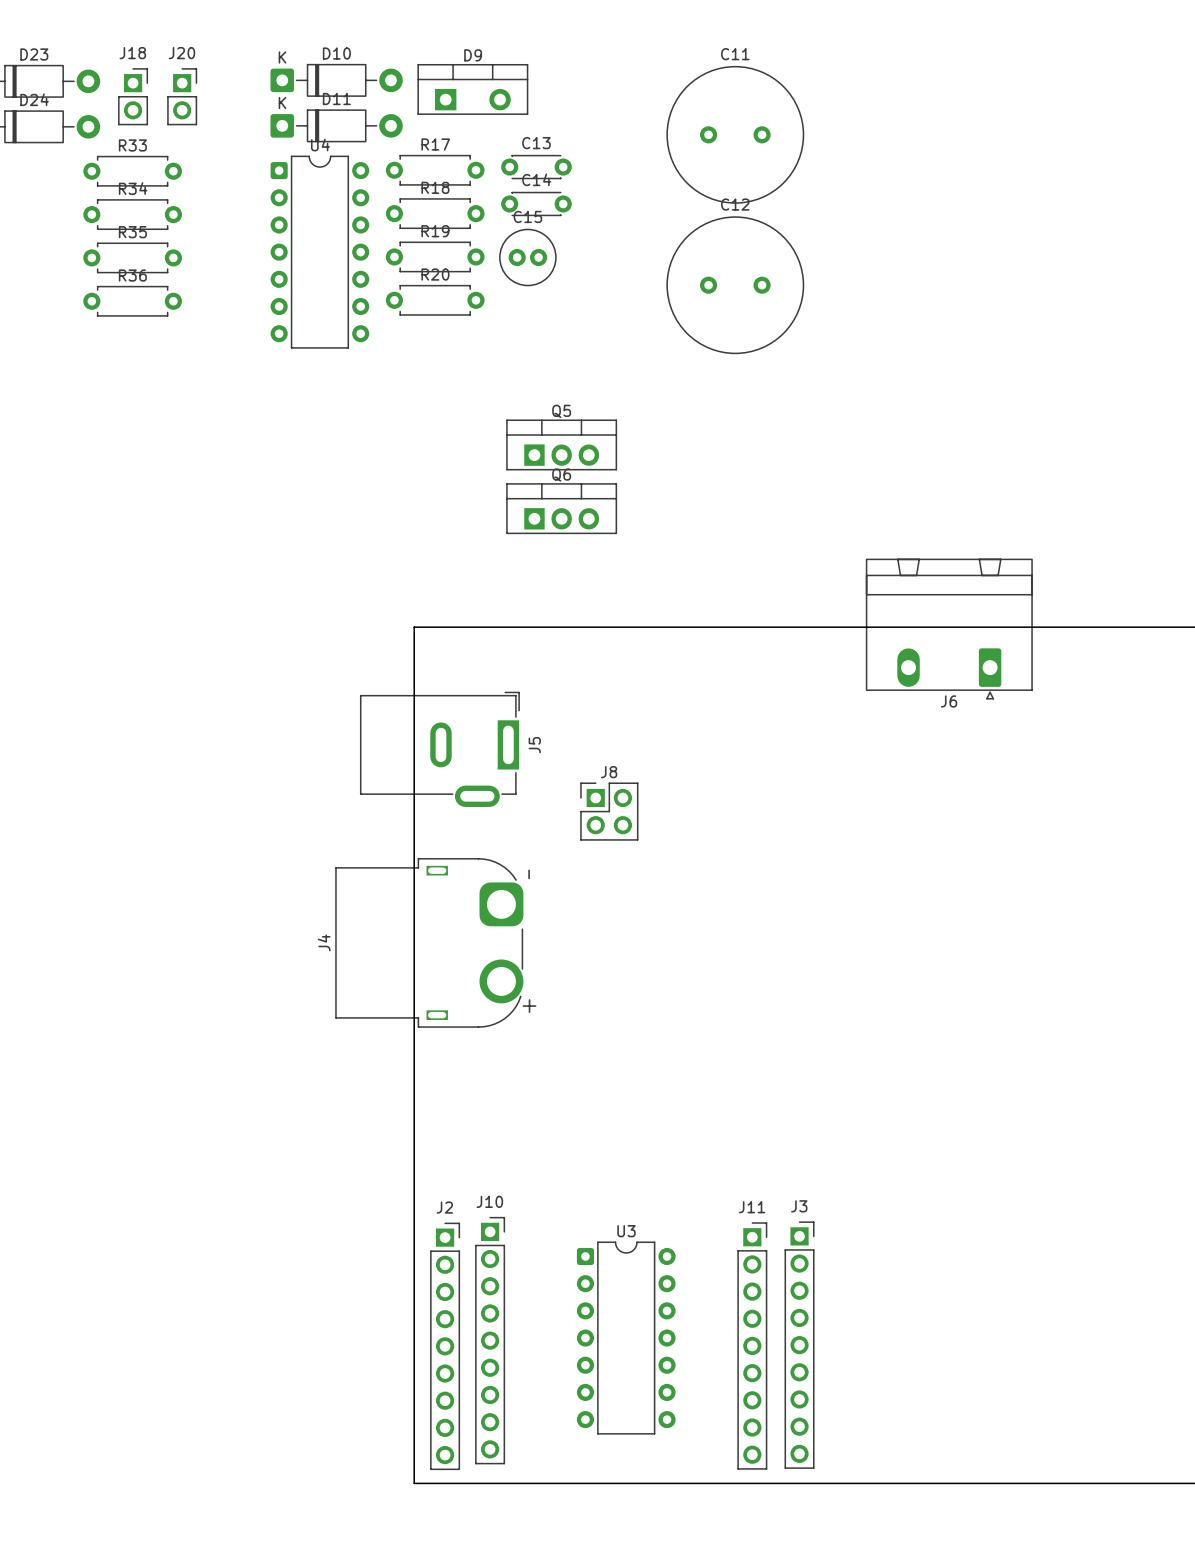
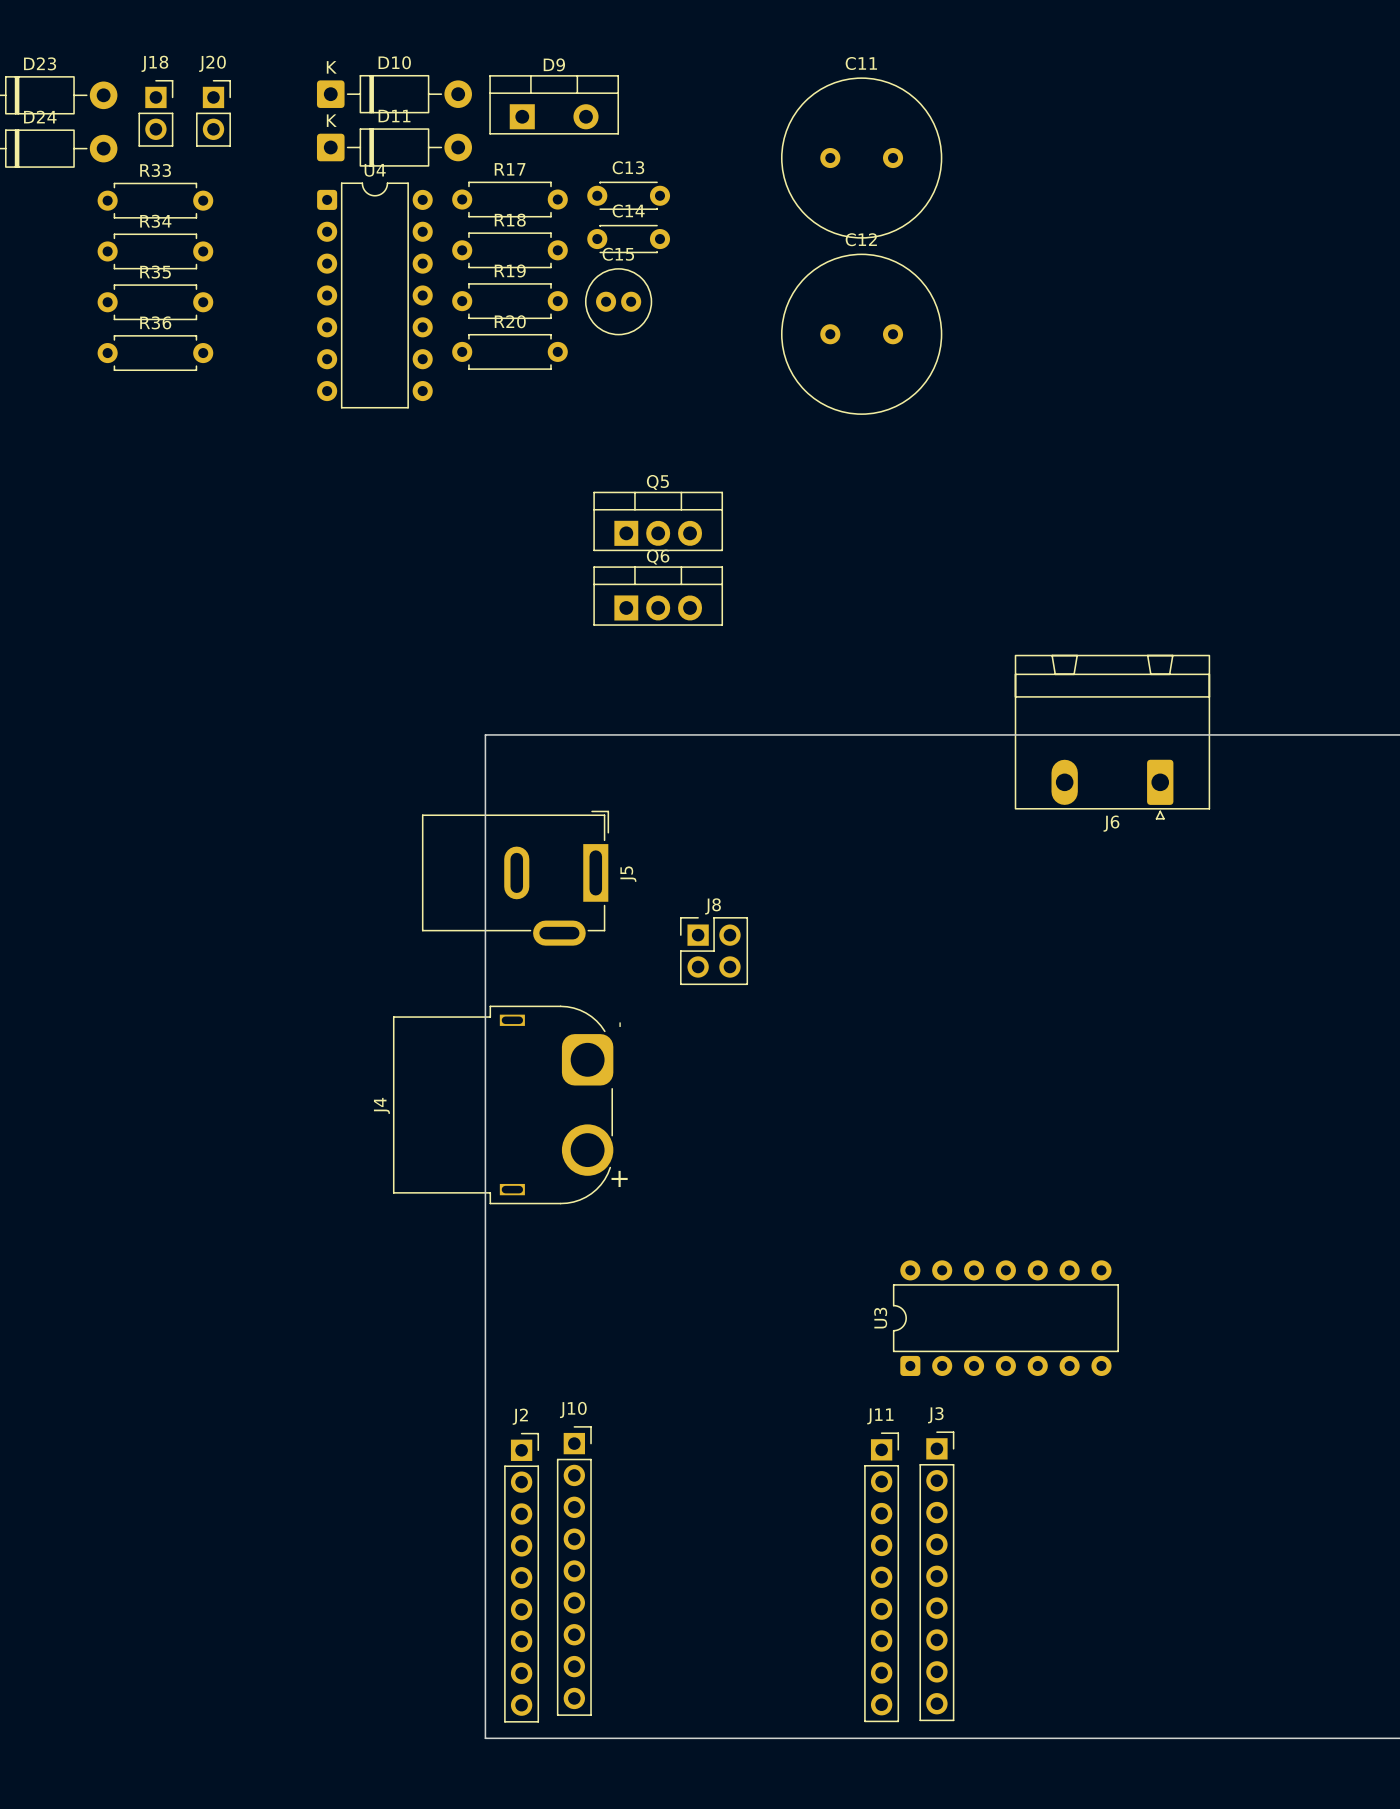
U3 rotation: 0° (626, 1338) -> 90° counterclockwise (1005, 1318)
U3 position: (626, 1338) -> (1005, 1318)

